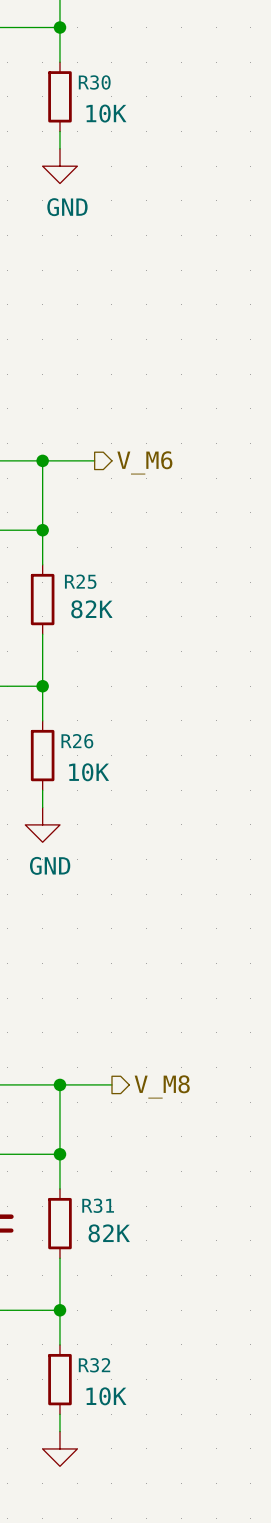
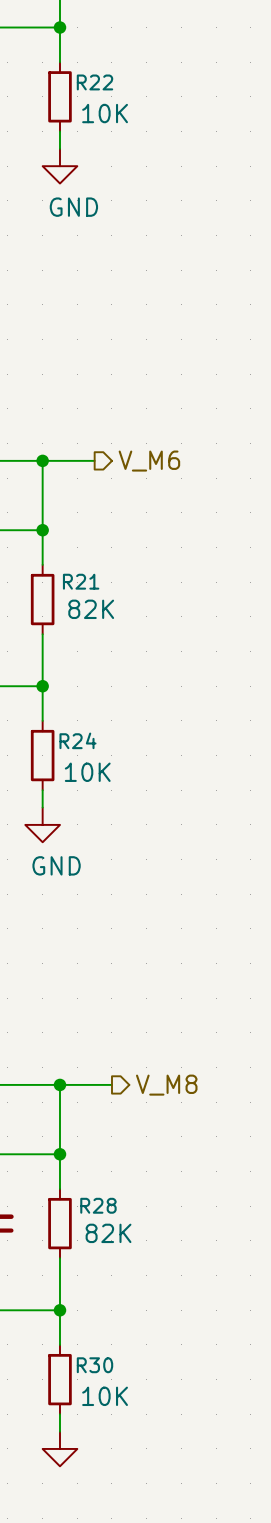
R30 name: R30 (94, 82) -> R22 (94, 82)
R25 name: R25 (80, 581) -> R21 (81, 581)
R26 name: R26 (77, 741) -> R24 (77, 740)
R31 name: R31 (98, 1205) -> R28 (98, 1205)
R32 name: R32 (94, 1365) -> R30 (94, 1365)

